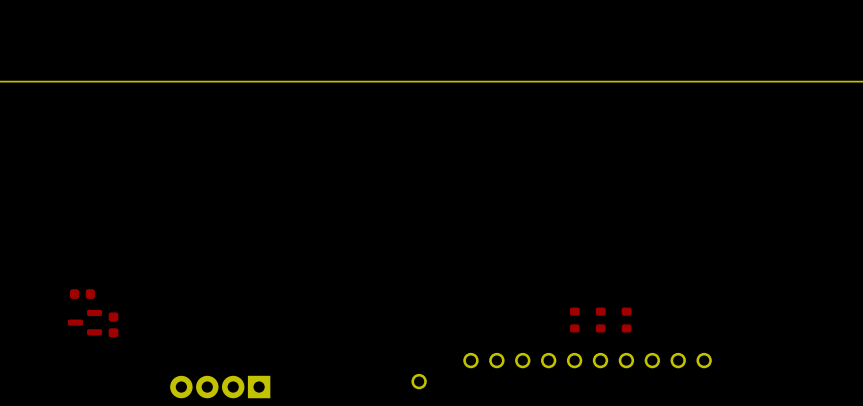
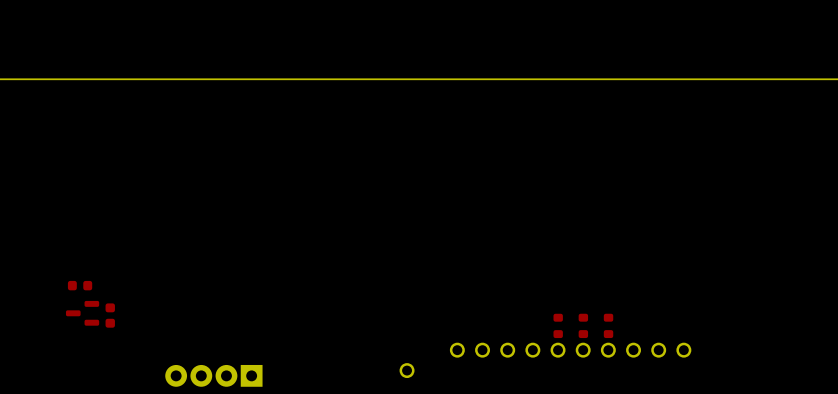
part: (574, 320) -> none
part: (600, 320) -> none
part: (626, 320) -> none
part: none -> (558, 325)
part: none -> (583, 325)
part: none -> (608, 325)

